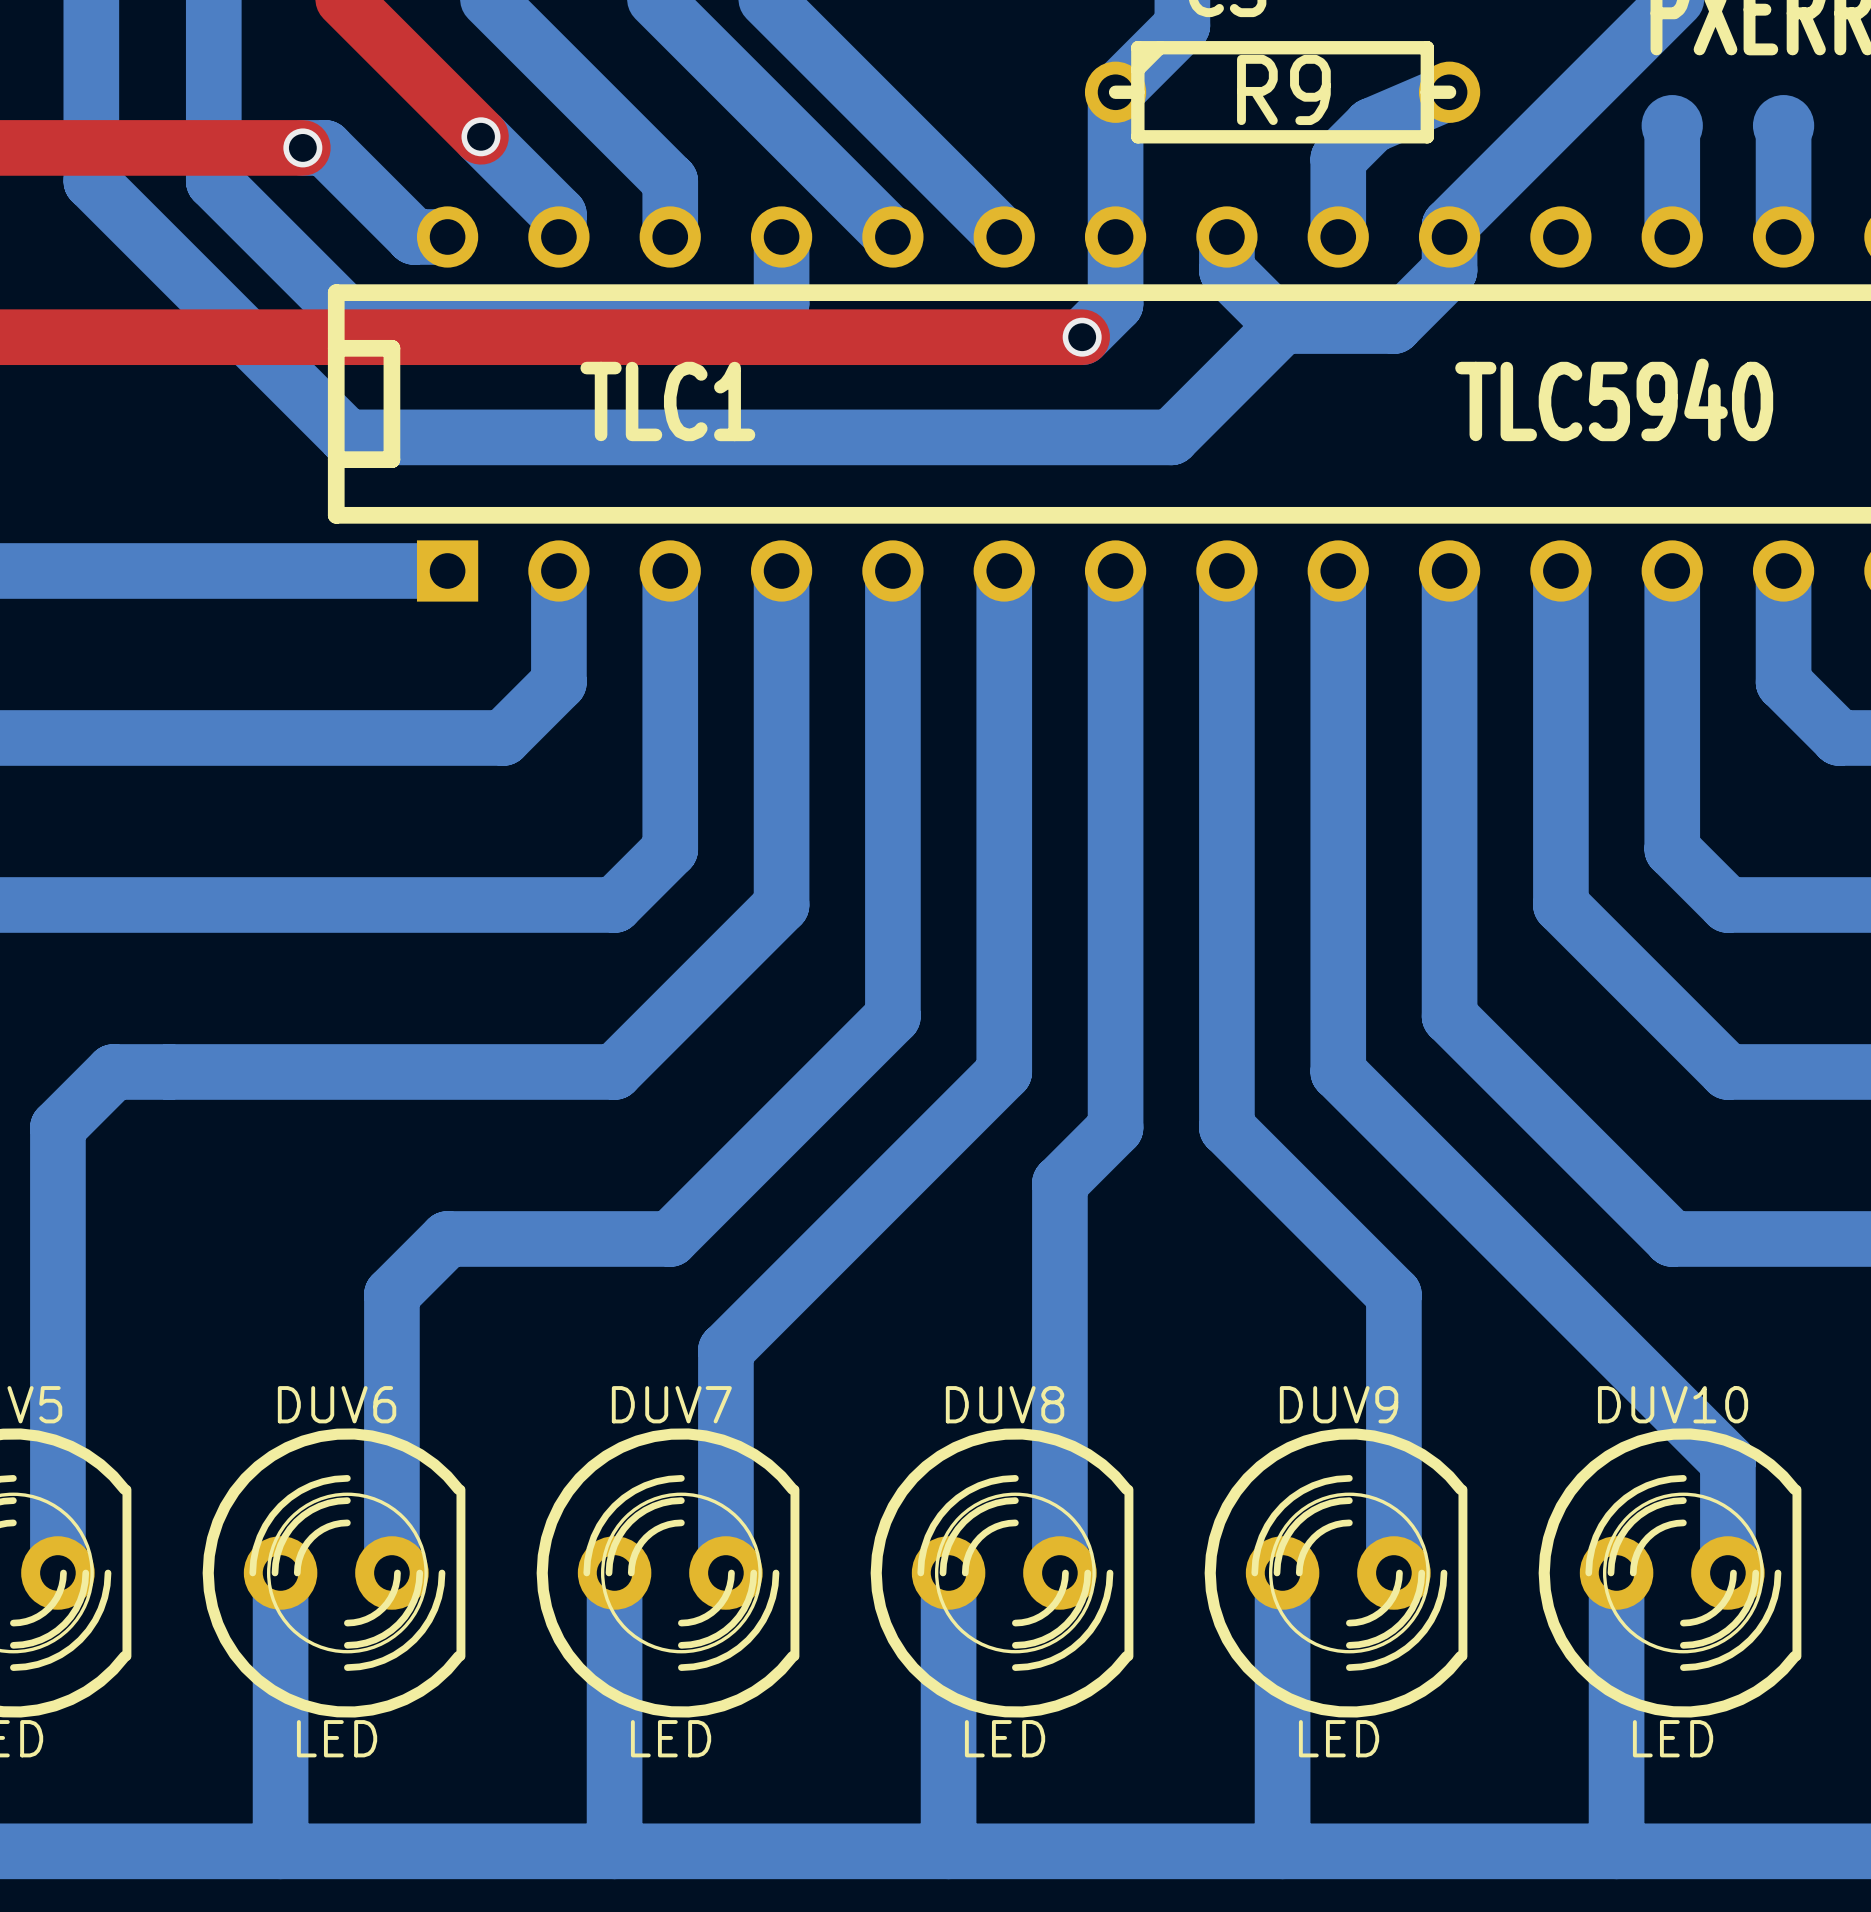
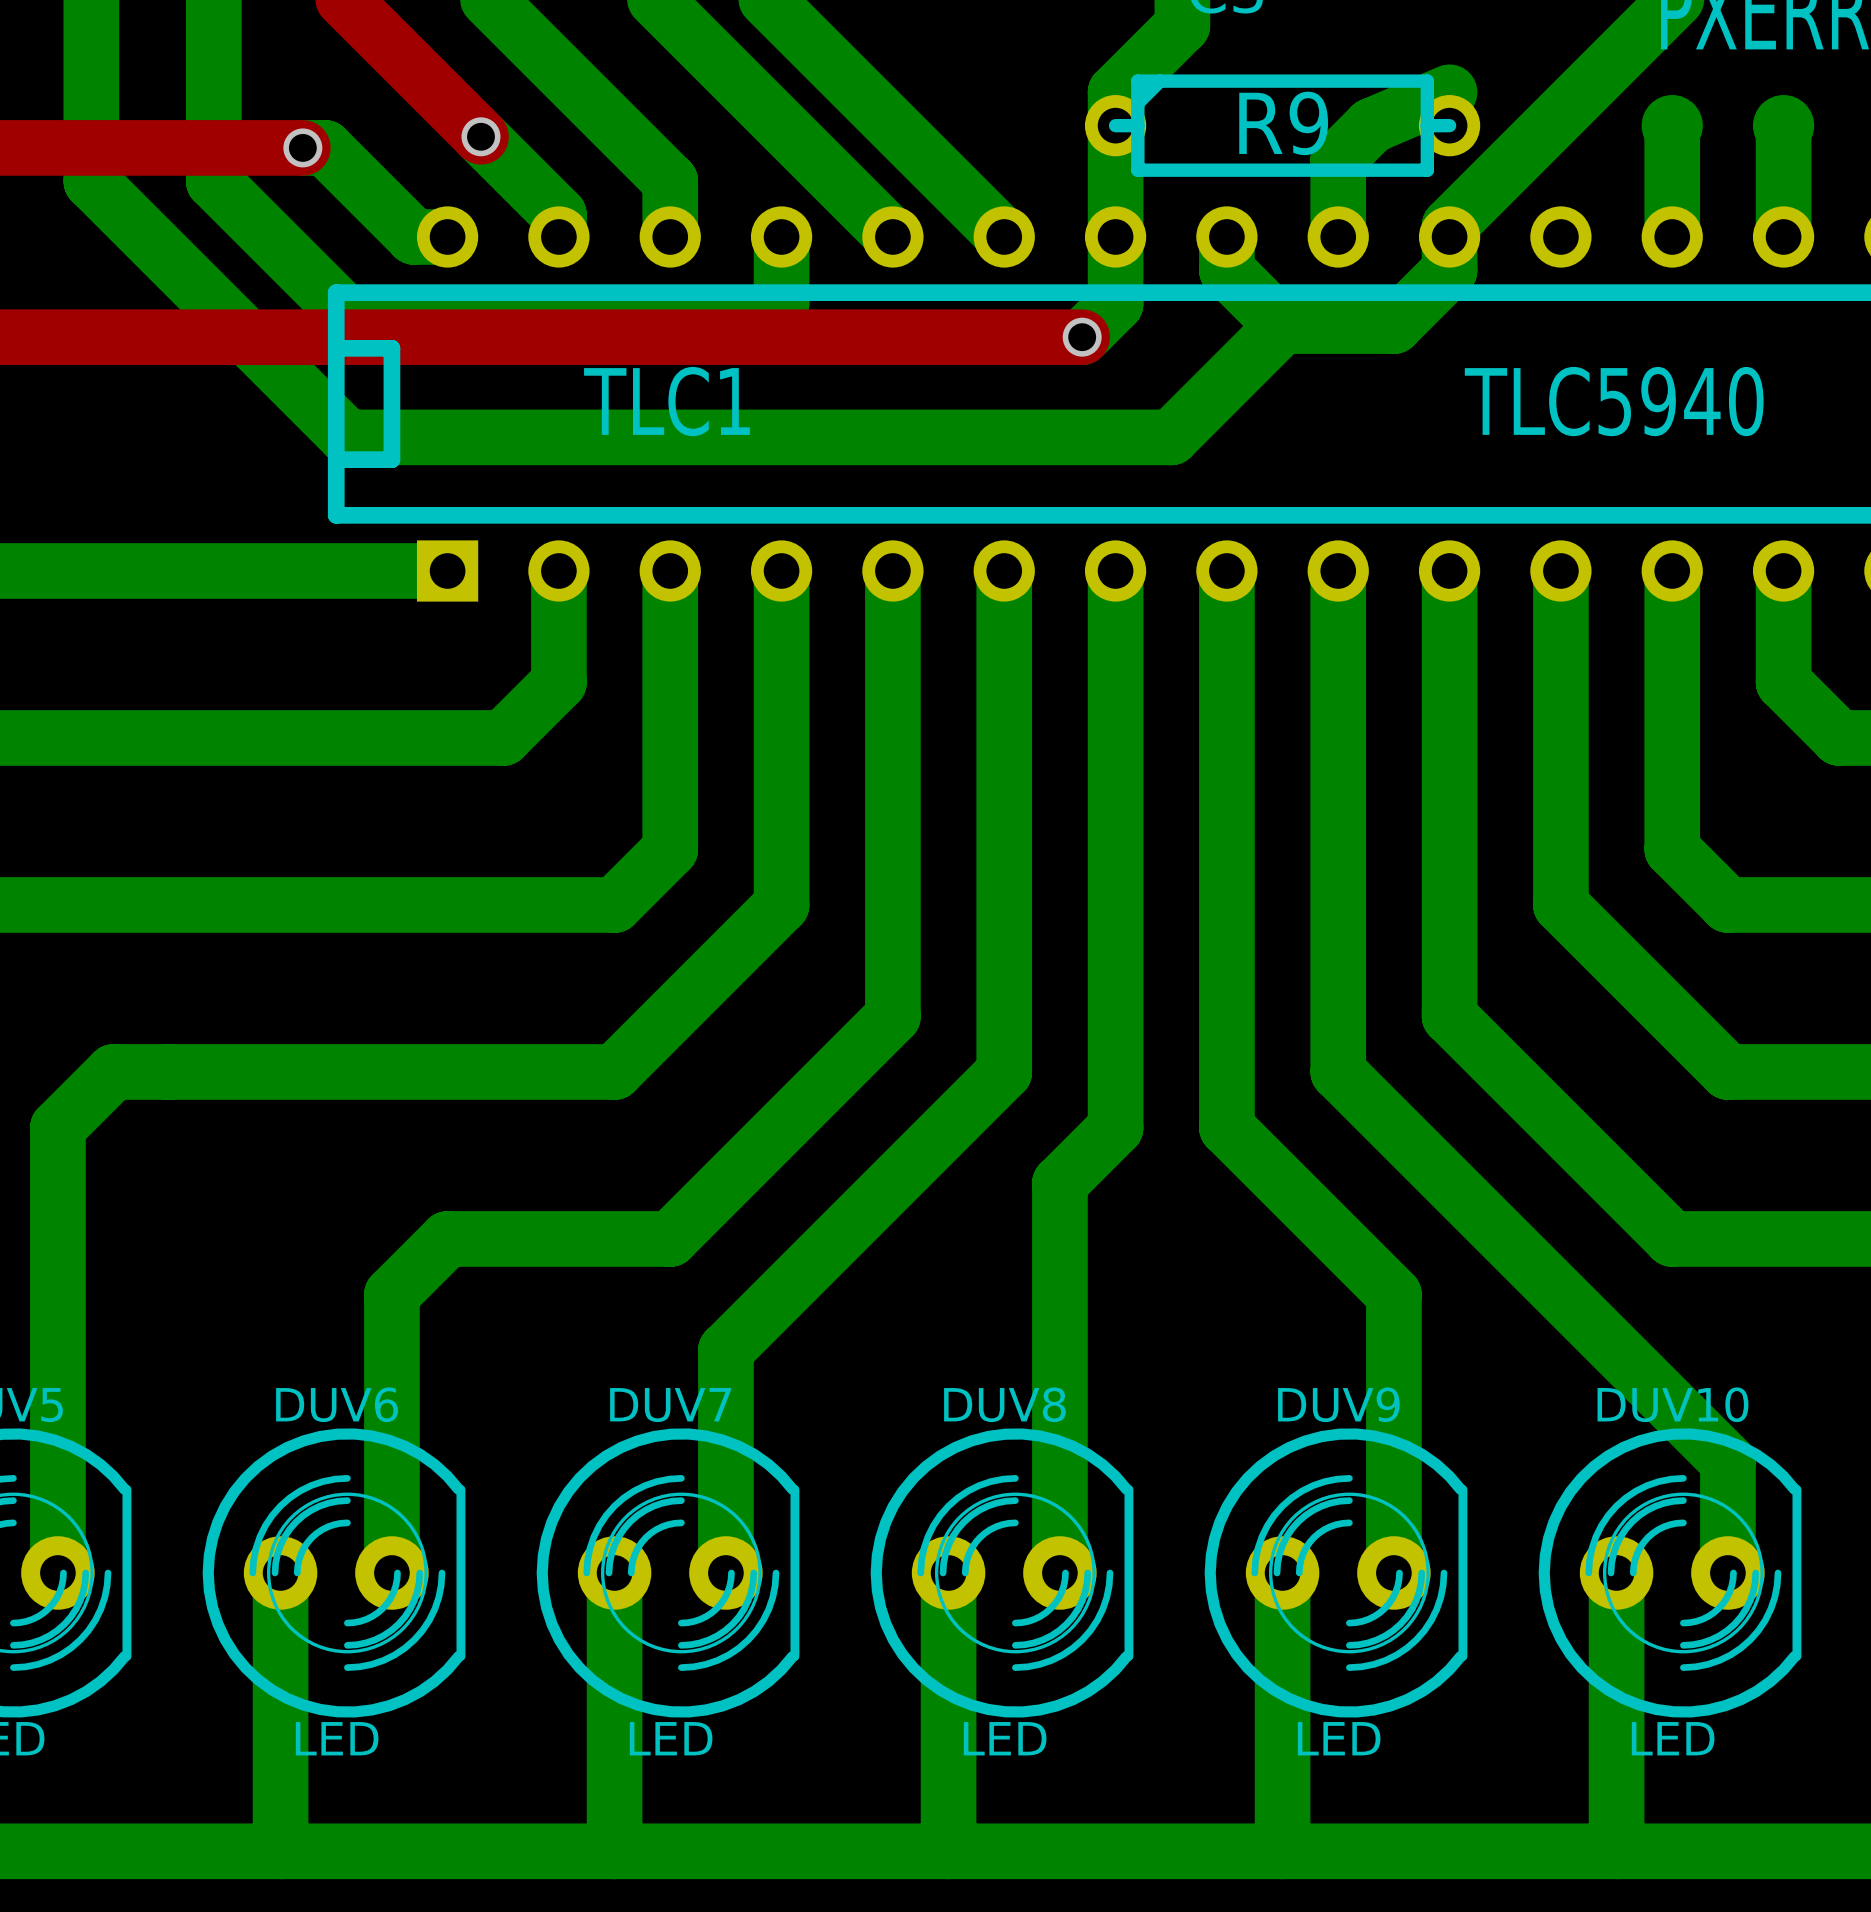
R9 position: (1282, 92) -> (1282, 125)

